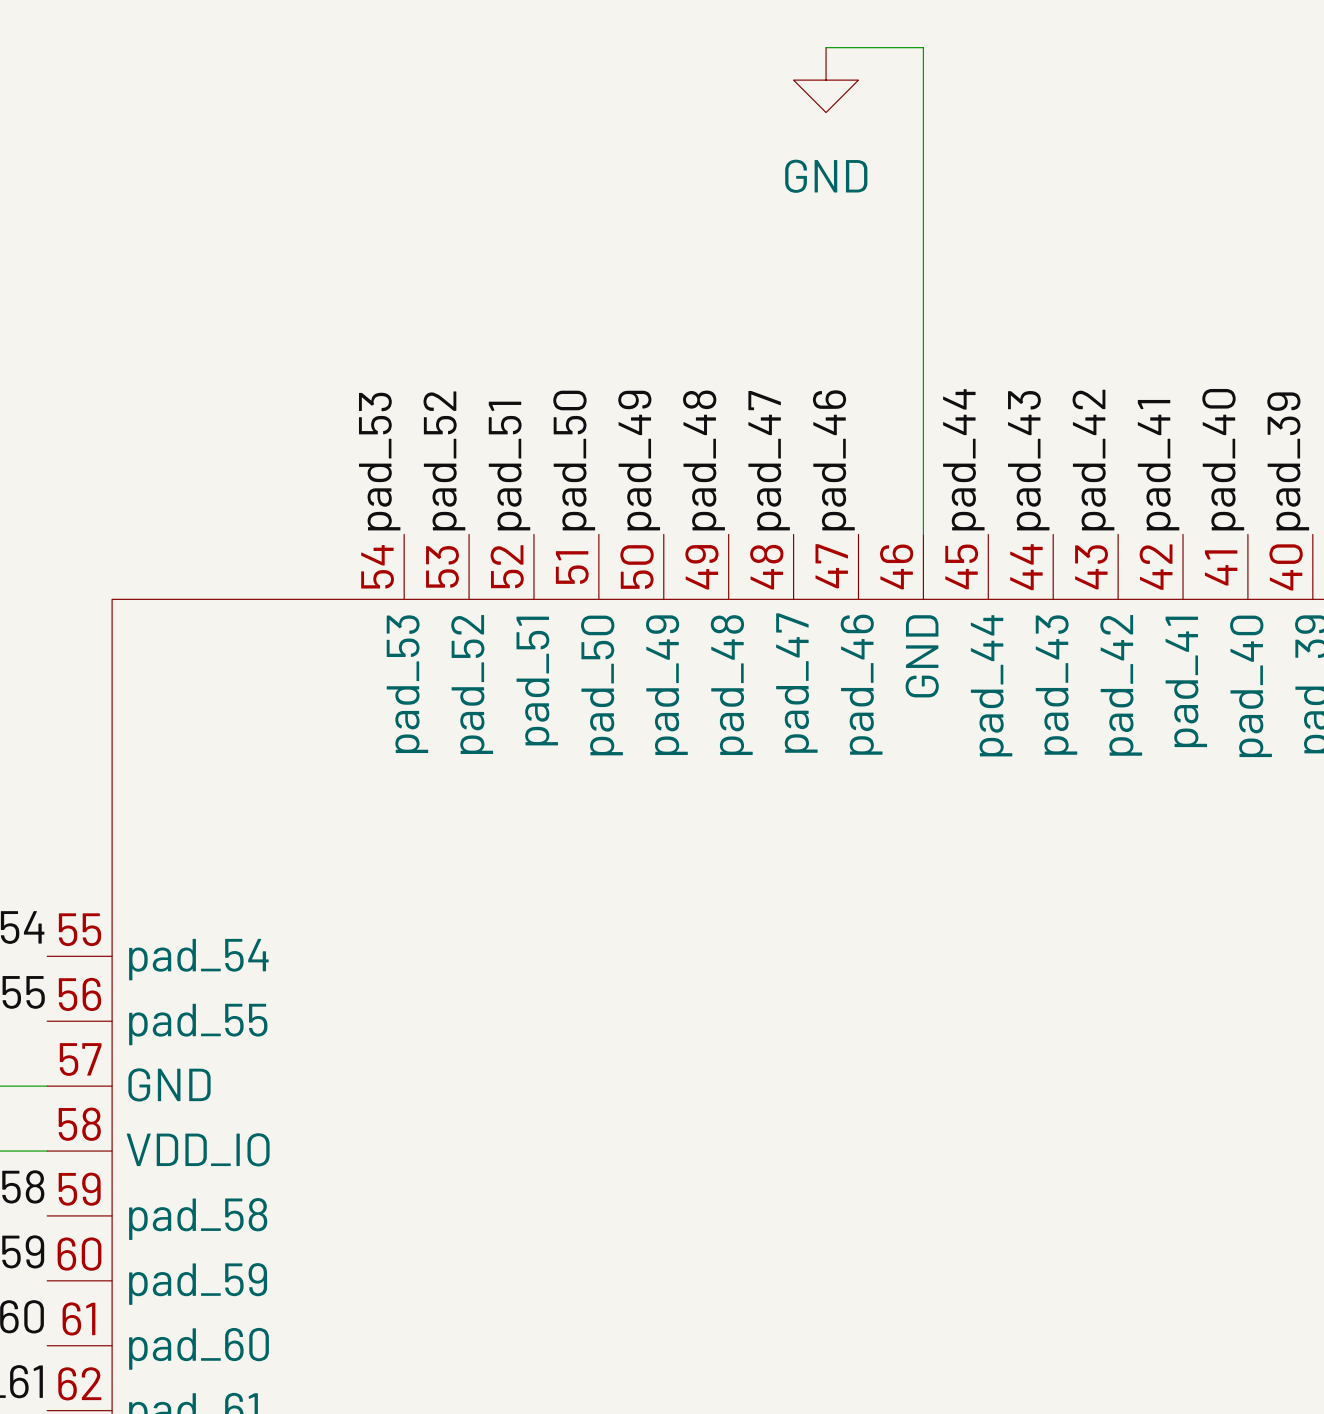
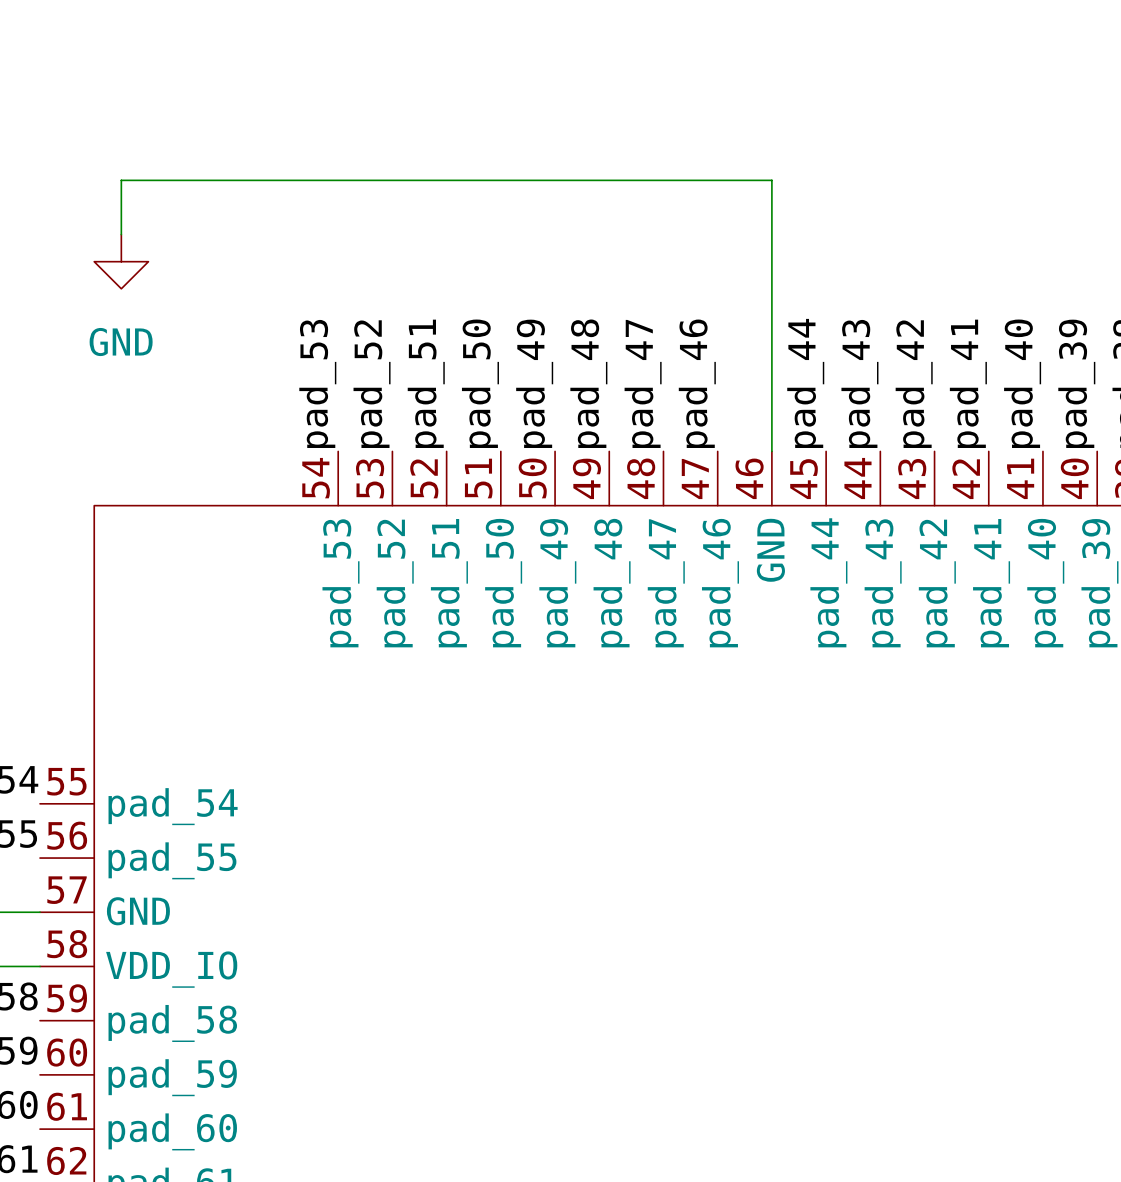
wire: (826, 47) (923, 47) (923, 209) -> (121, 234) (121, 180) (771, 180)
power symbol: GND (826, 80) -> none
power symbol: none -> GND (121, 261)

